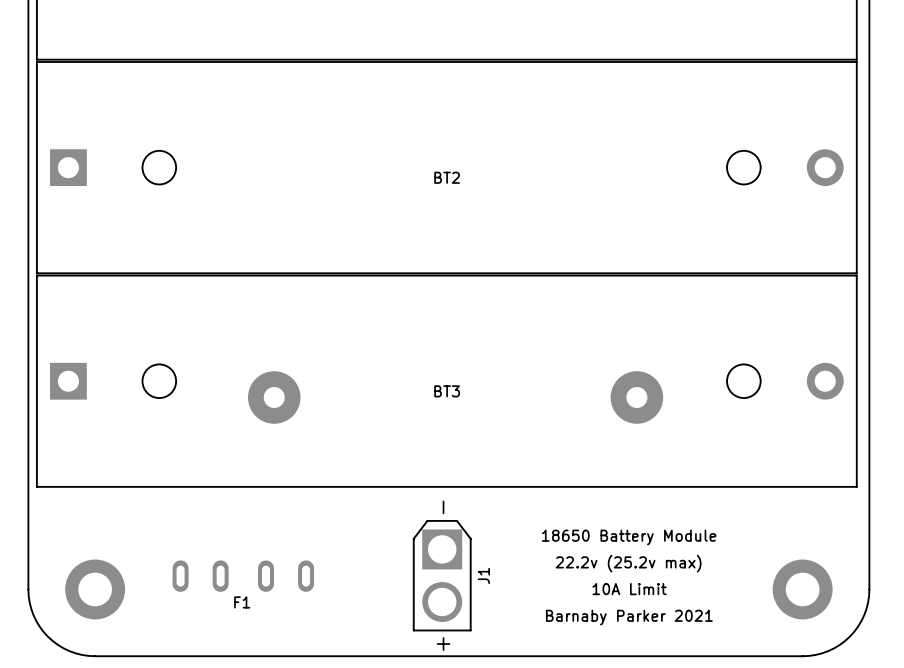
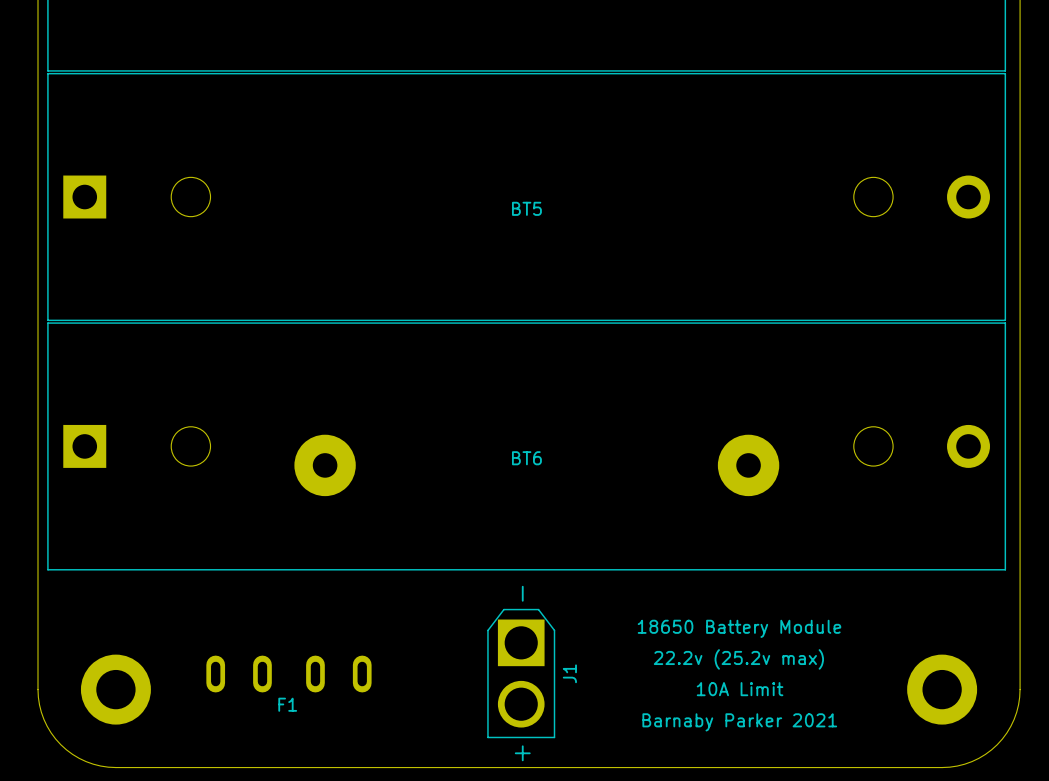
BT2 name: BT2 (447, 177) -> BT5 (526, 208)
BT3 name: BT3 (447, 391) -> BT6 (526, 458)

